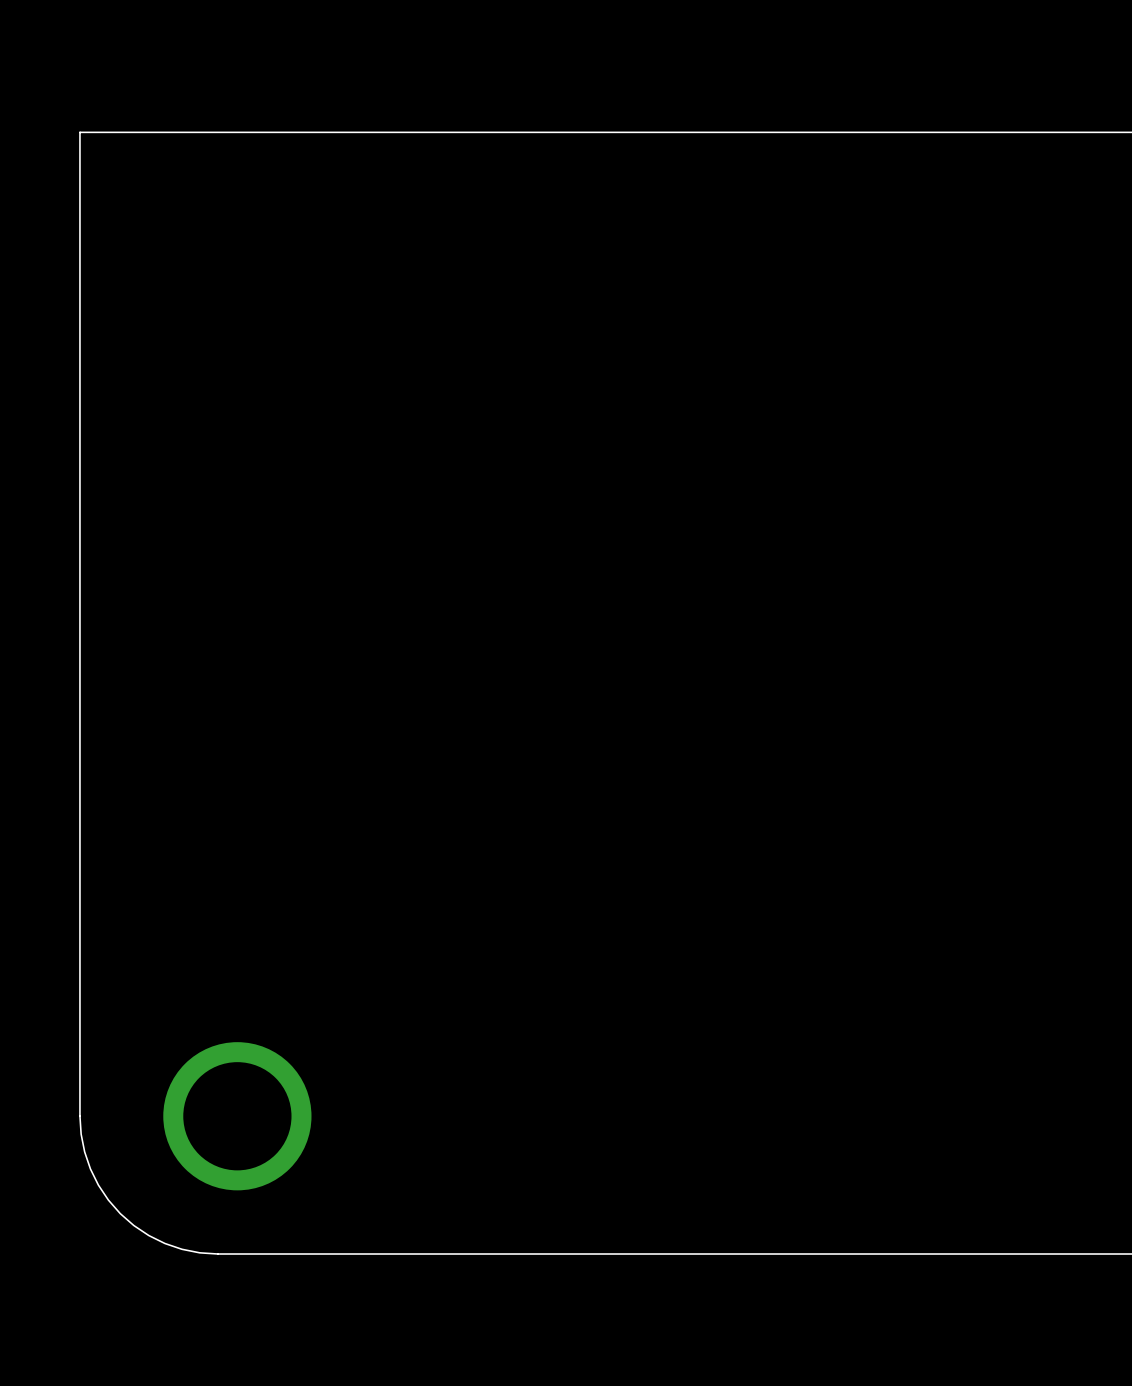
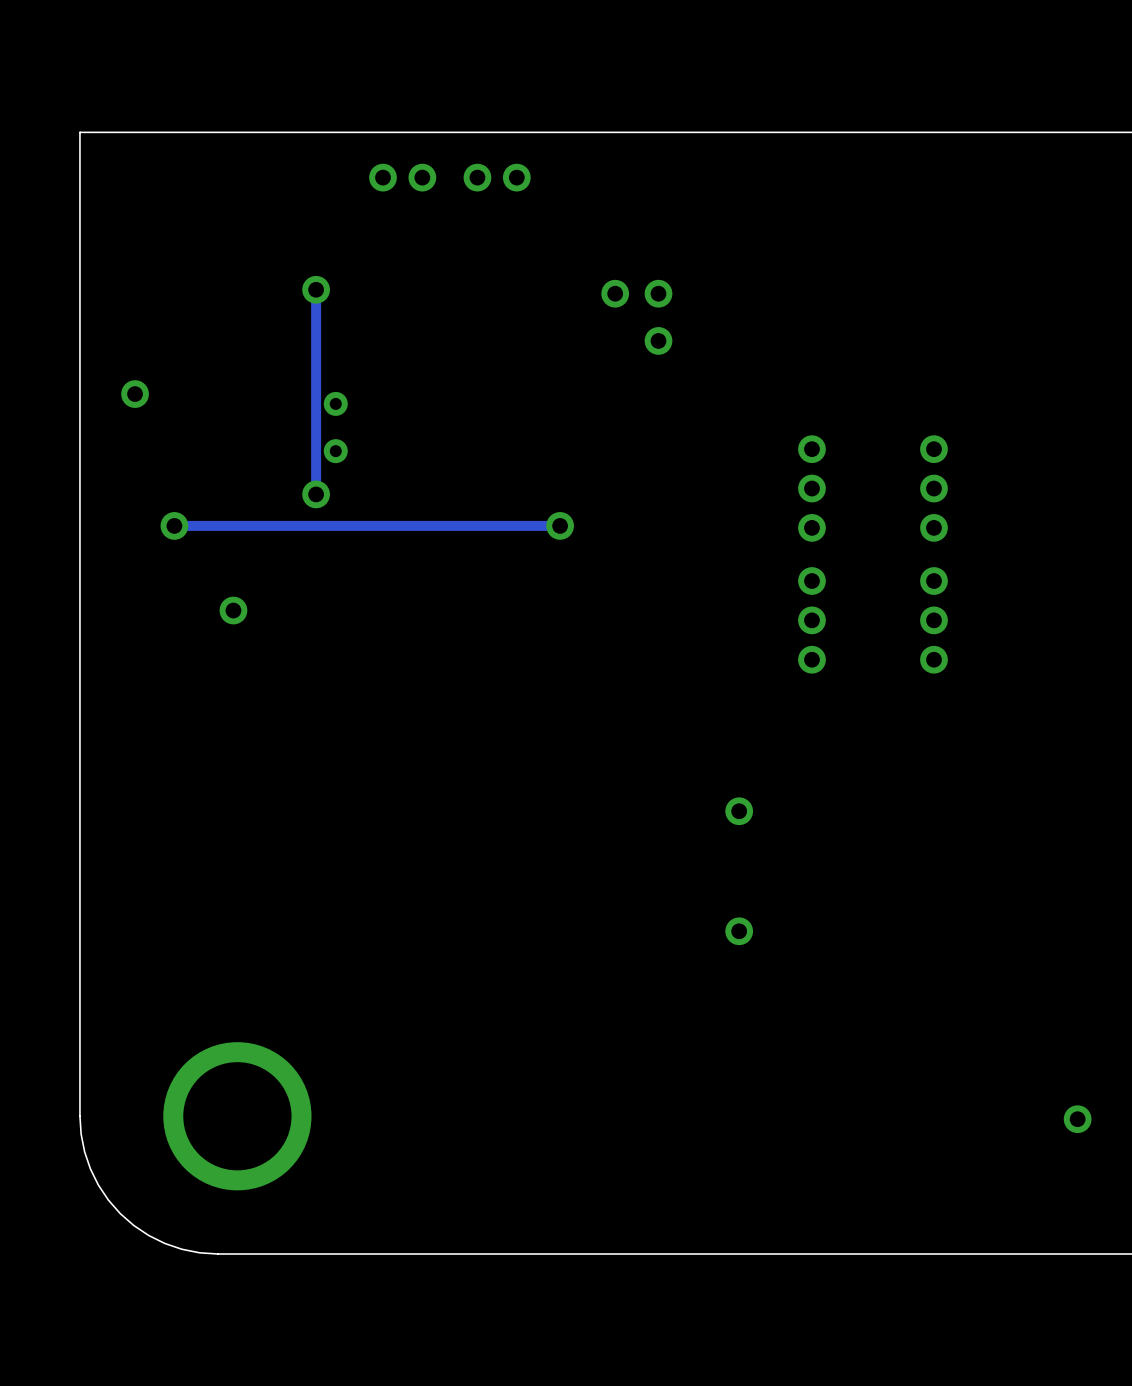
via: none -> (383, 177)
via: none -> (422, 177)
via: none -> (477, 177)
via: none -> (516, 177)
track: none -> (316, 289) (316, 494)
via: none -> (316, 289)
via: none -> (615, 293)
via: none -> (658, 293)
via: none -> (658, 340)
via: none -> (135, 394)
part: none -> (335, 427)
via: none -> (811, 449)
via: none -> (933, 449)
via: none -> (811, 488)
via: none -> (933, 488)
via: none -> (316, 494)
via: none -> (174, 525)
track: none -> (560, 525) (174, 525)
via: none -> (560, 525)
via: none -> (811, 527)
via: none -> (933, 527)
via: none -> (811, 581)
via: none -> (933, 581)
via: none -> (233, 610)
via: none -> (811, 620)
via: none -> (933, 620)
via: none -> (811, 659)
via: none -> (933, 659)
via: none -> (739, 811)
via: none -> (739, 931)
via: none -> (1077, 1119)

